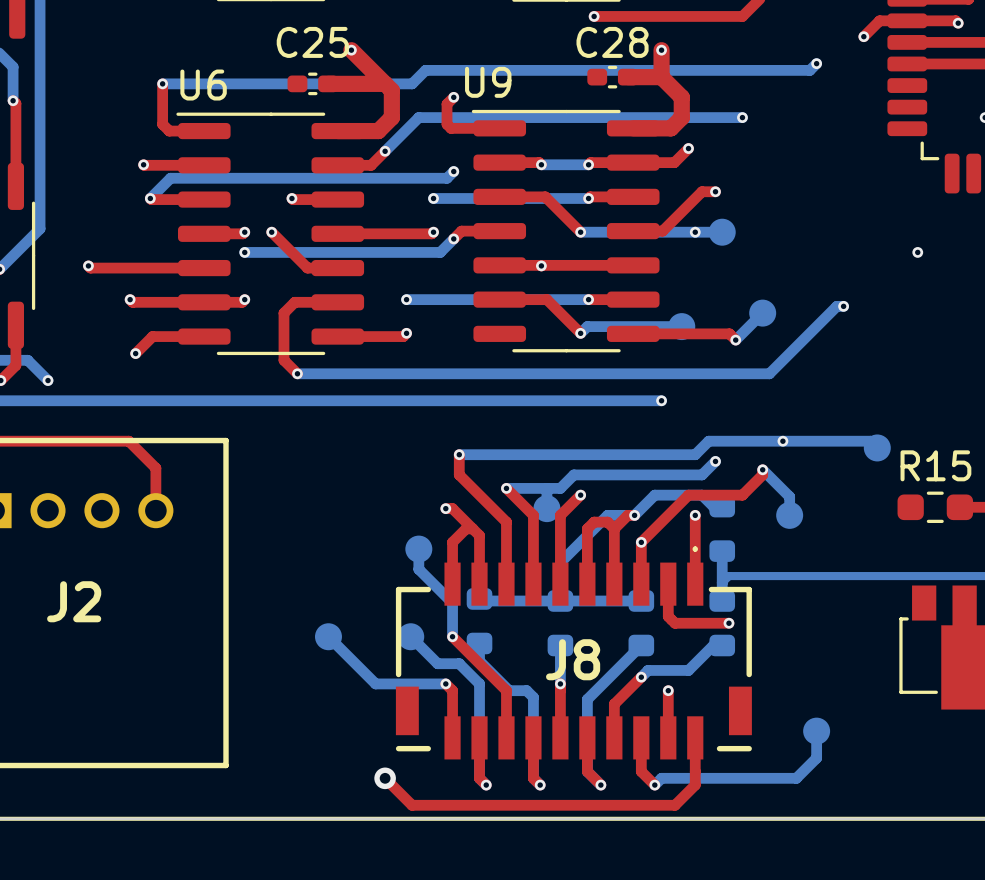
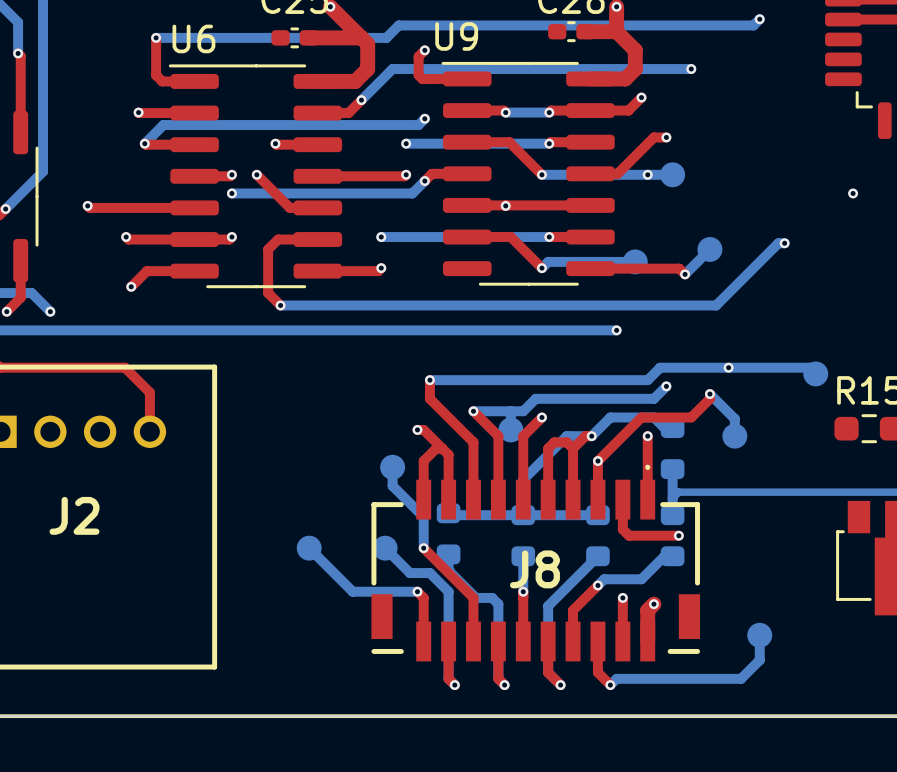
via: none -> (653, 604)
top track: (695, 737) (695, 785) (675, 805) (412, 805) (385, 778) -> (647, 641) (647, 610) (653, 604)
via: (385, 778) -> none

